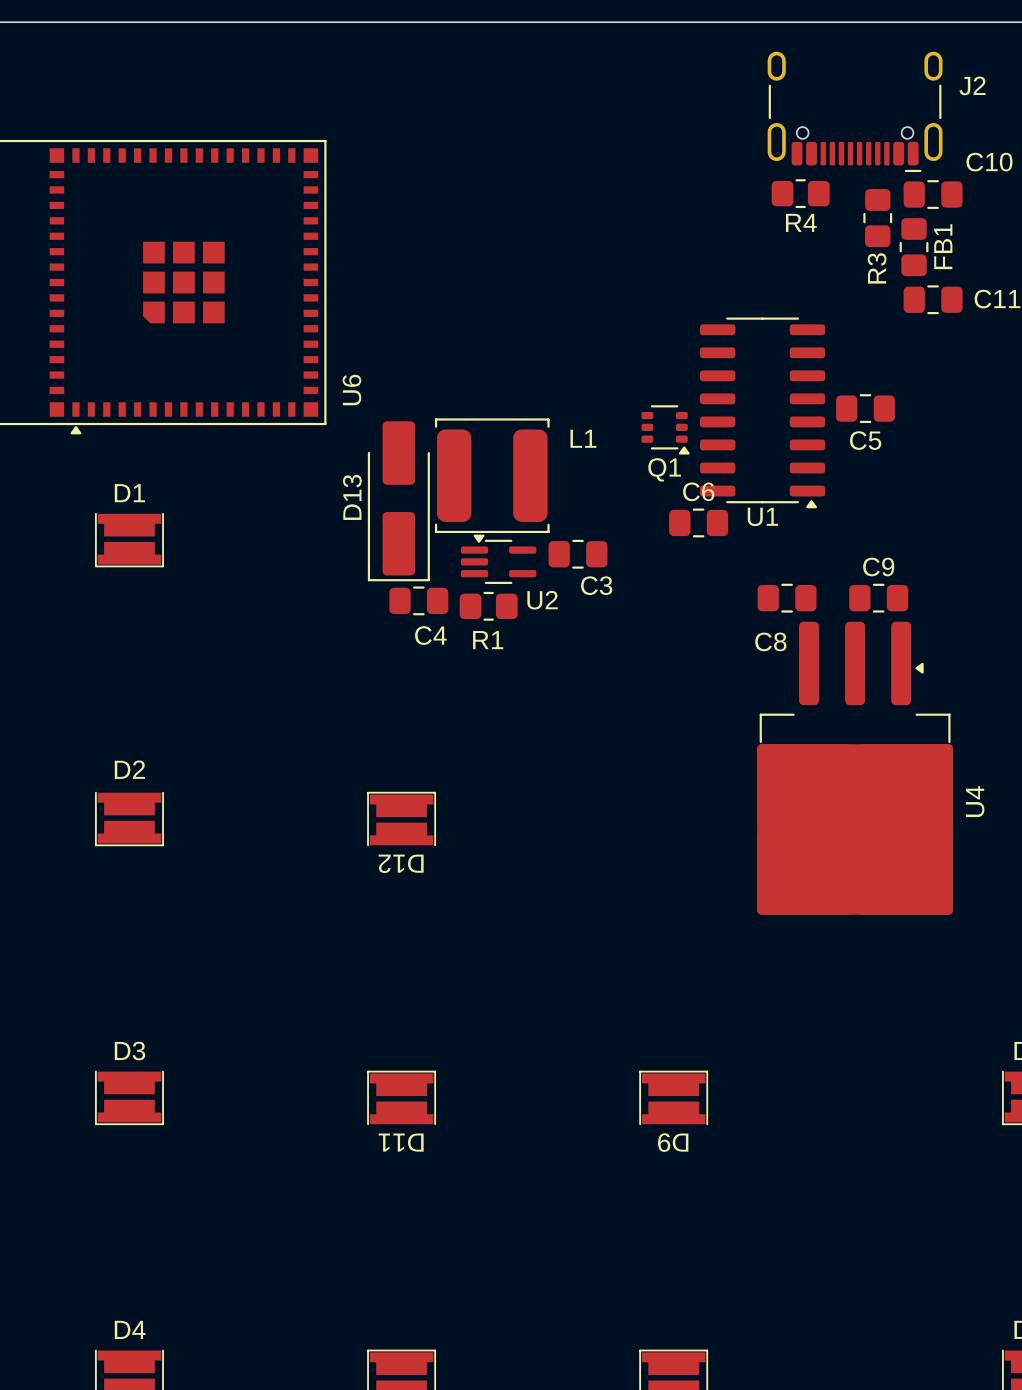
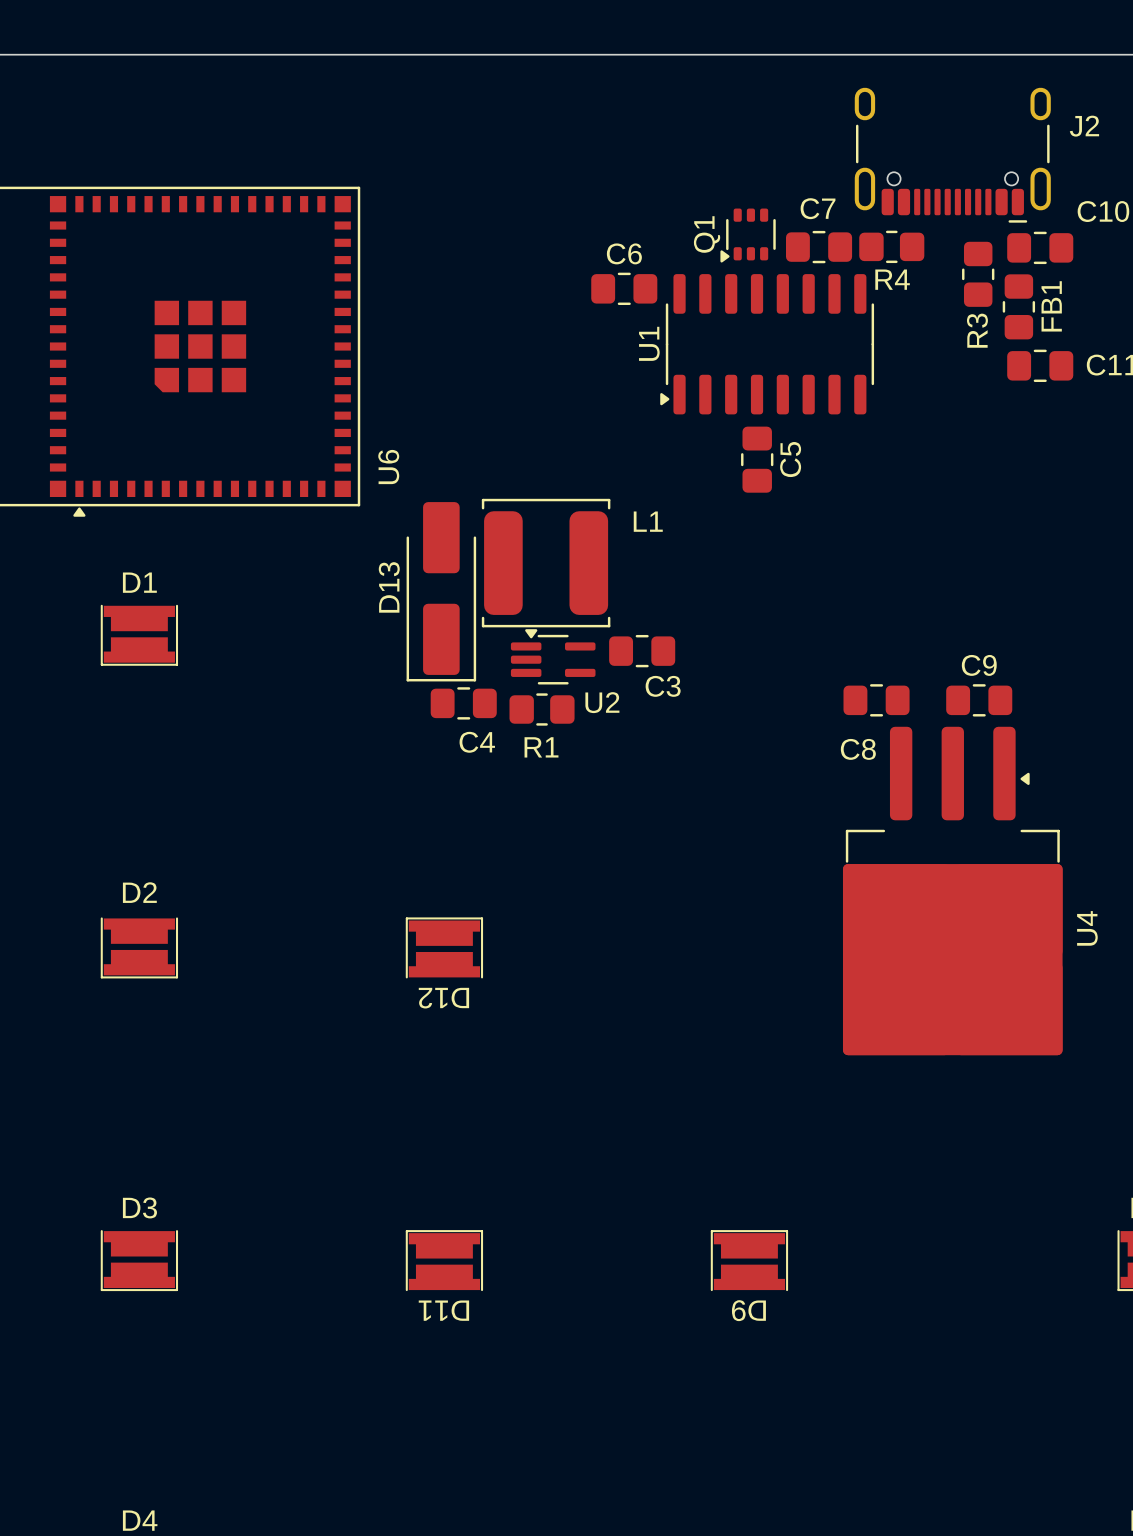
C7: none -> (819, 247)
C5 rotation: 0° (865, 408) -> 90° clockwise (757, 459)
C5 position: (865, 408) -> (757, 459)
U1 rotation: 0° (762, 412) -> 90° clockwise (767, 344)
U1 position: (762, 412) -> (767, 344)
Q1 rotation: 0° (665, 429) -> 90° clockwise (748, 235)
Q1 position: (665, 429) -> (748, 235)
C5 name position: C5 (865, 440) -> C5 (790, 459)
C6 position: (698, 522) -> (624, 288)

